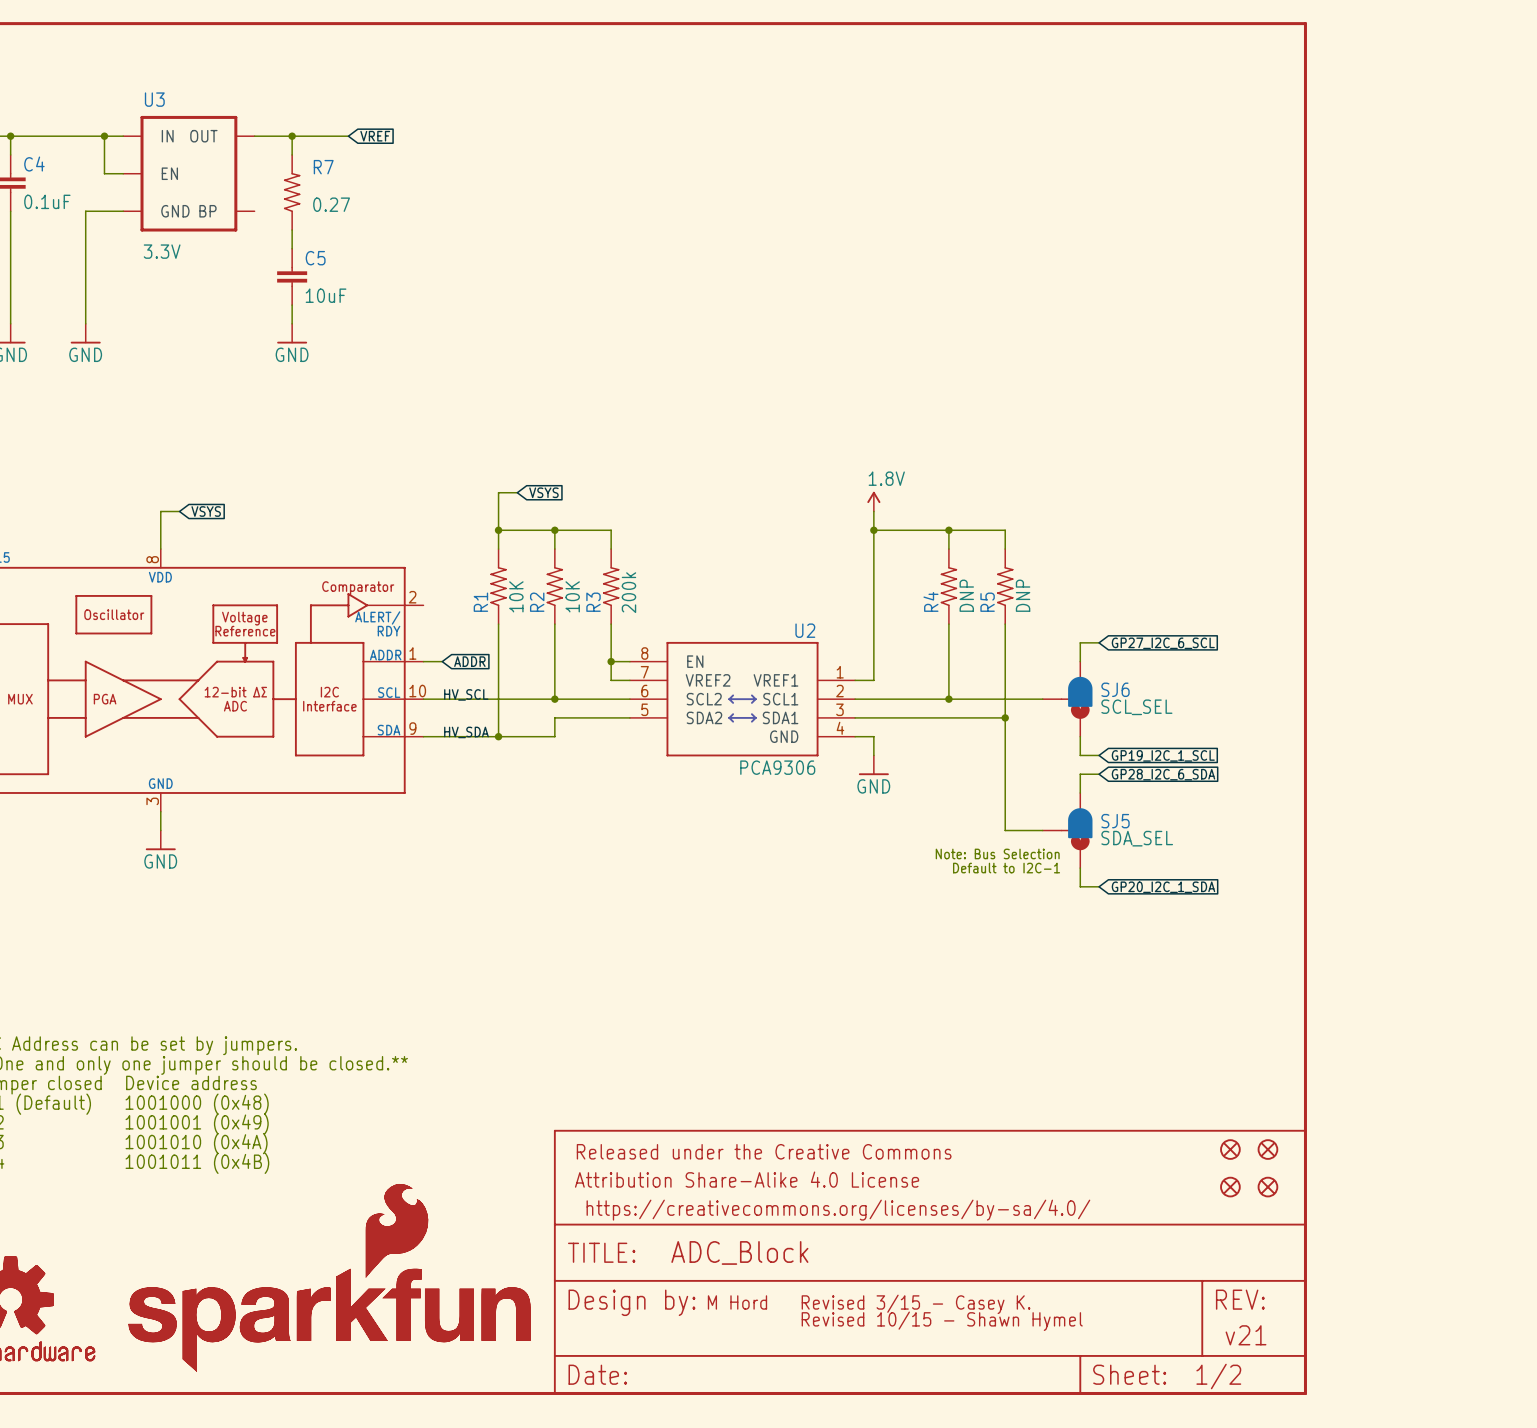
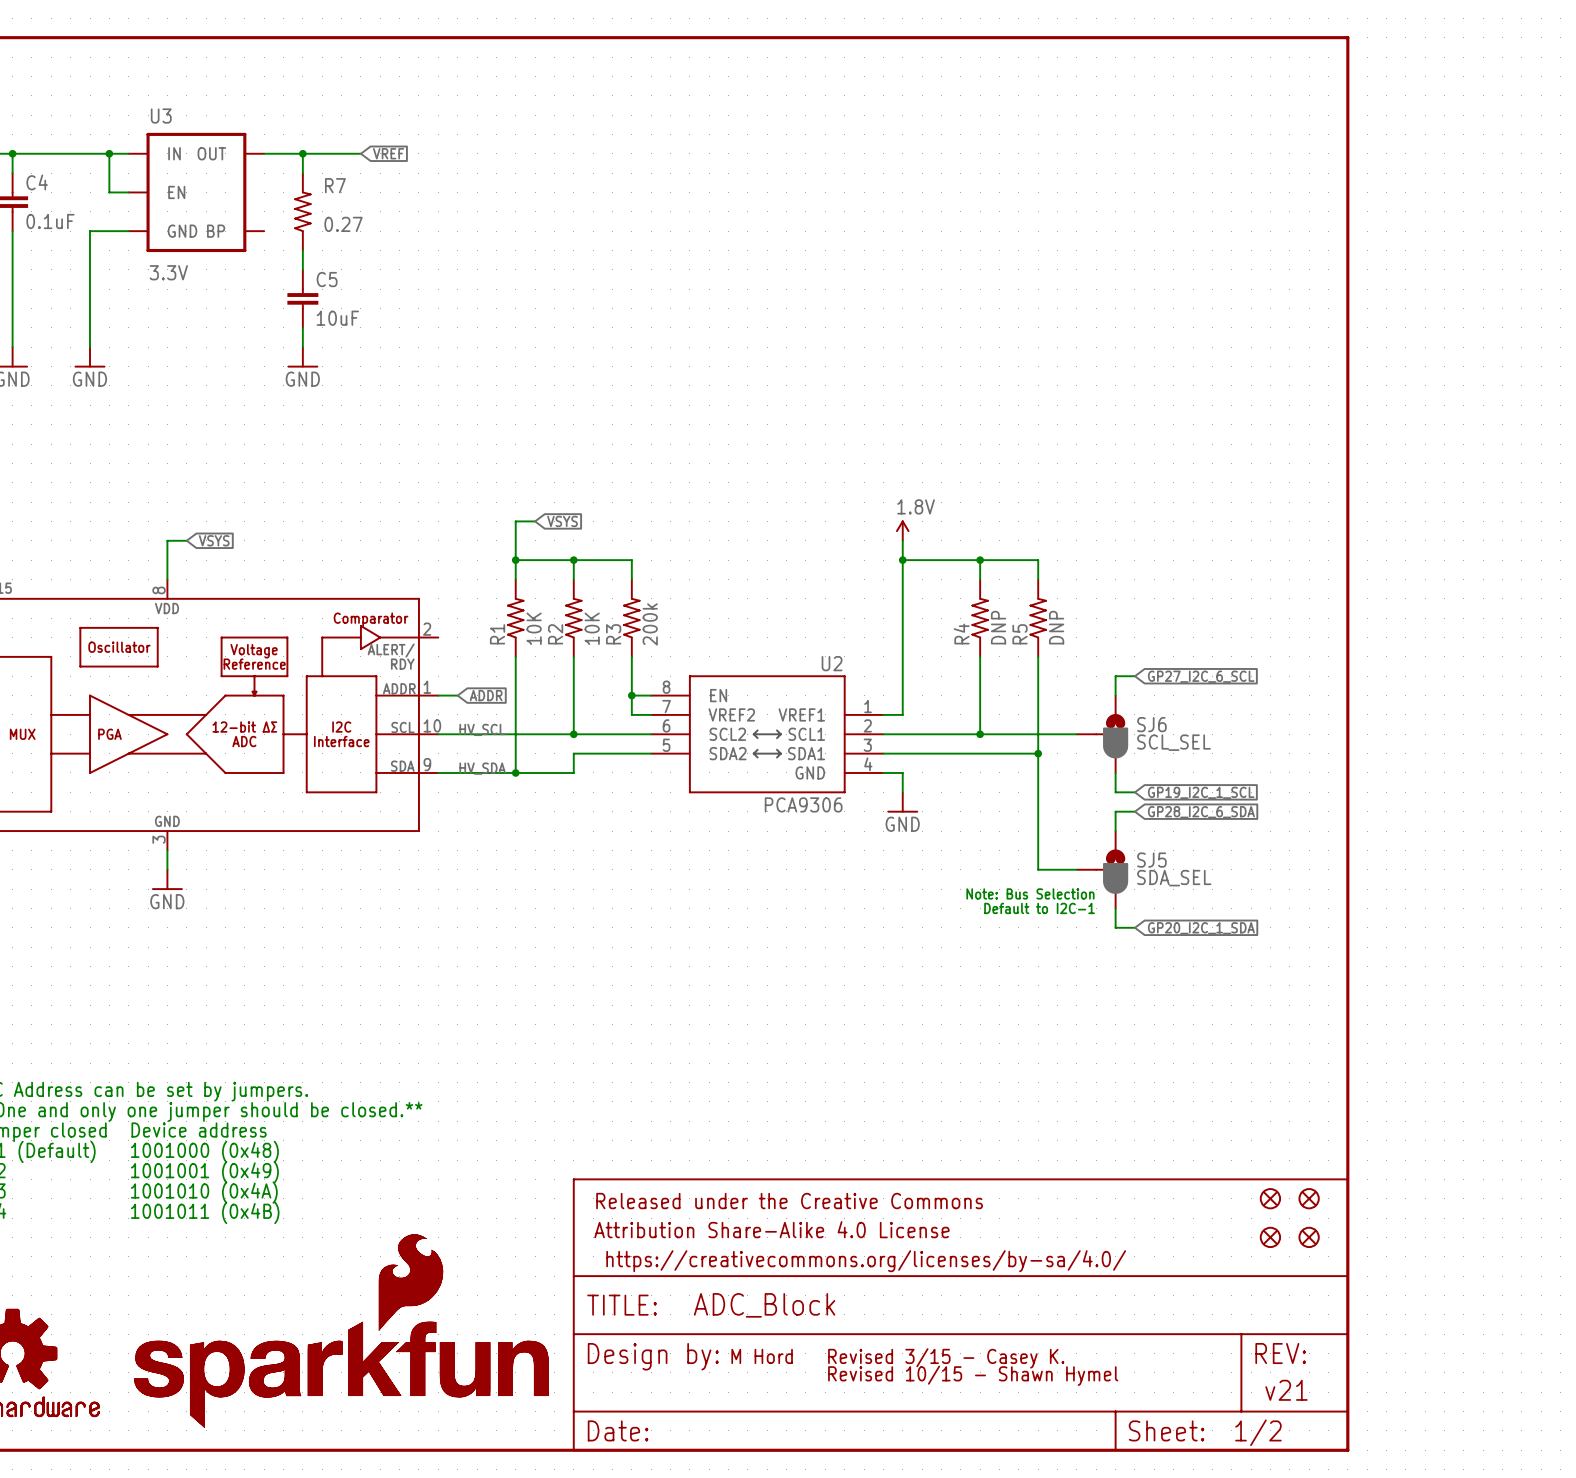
SJ6 symbol: [1042, 661, 1093, 737] -> [1076, 695, 1129, 773]
SJ5 symbol: [1042, 792, 1093, 869] -> [1076, 831, 1129, 909]

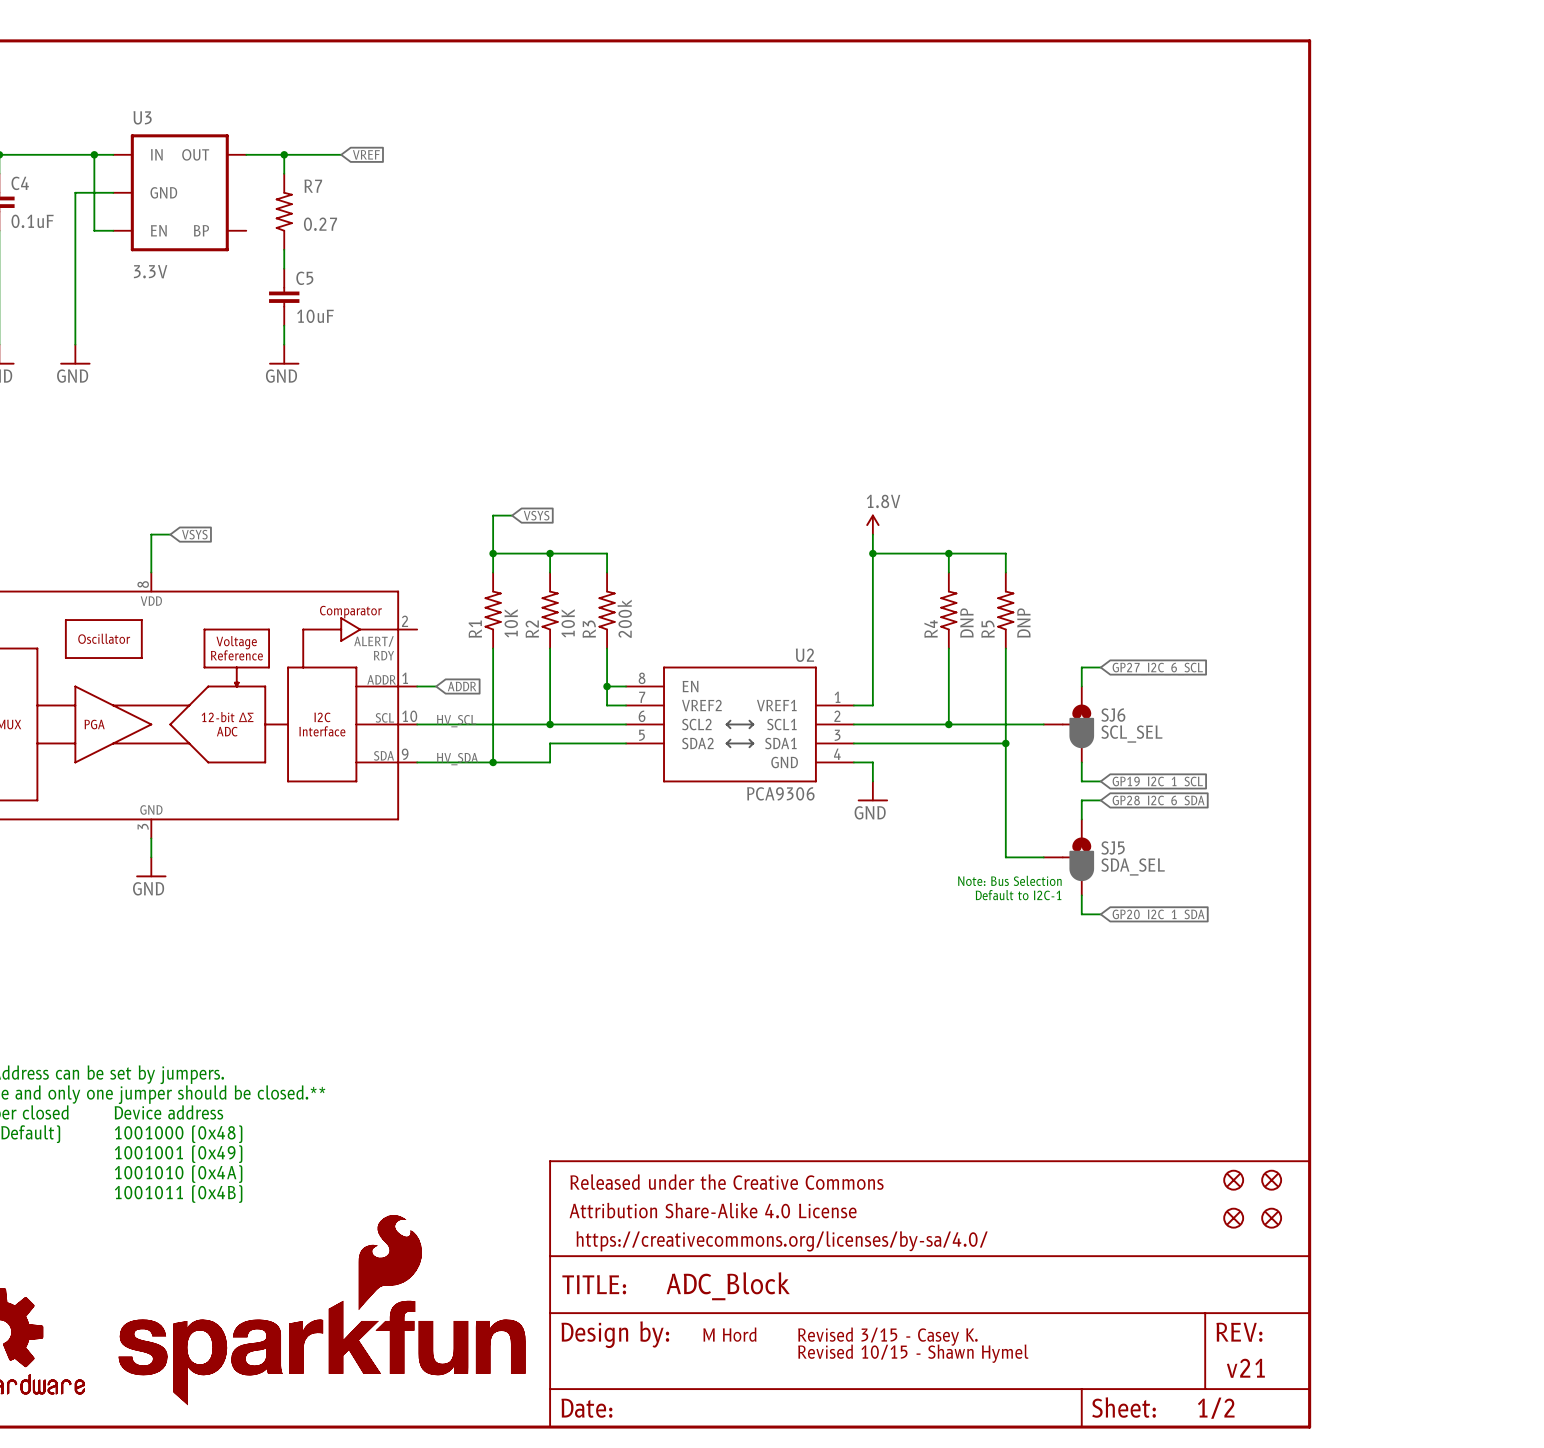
U3 pin name: EN (176, 192) -> GND (163, 192)
wire: (90, 231) (109, 231) -> (75, 230) (75, 192) (94, 192) (94, 230)
U3 pin name: GND (182, 231) -> EN (158, 230)

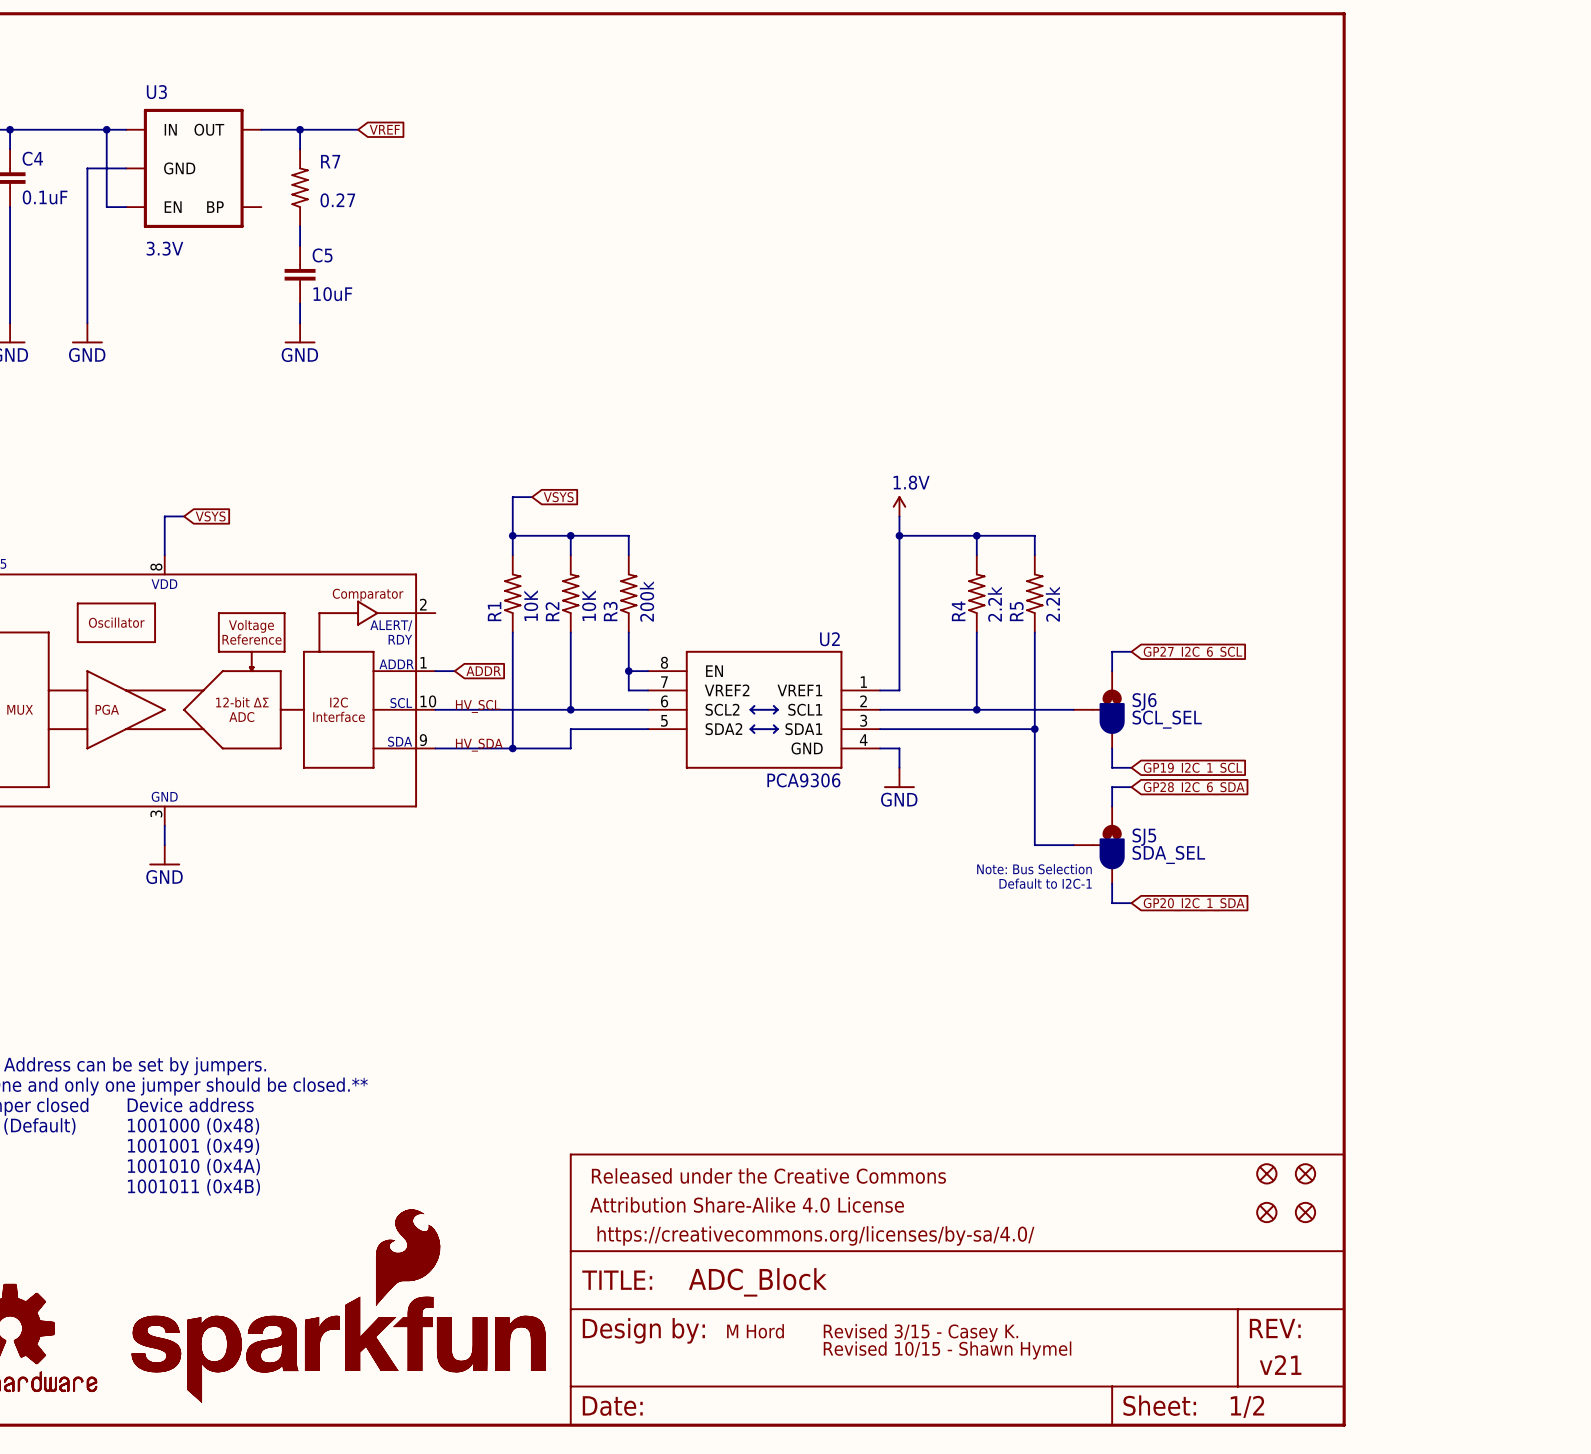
R4 value: DNP (966, 623) -> 2.2k (994, 604)
R5 value: DNP (1023, 623) -> 2.2k (1052, 604)

